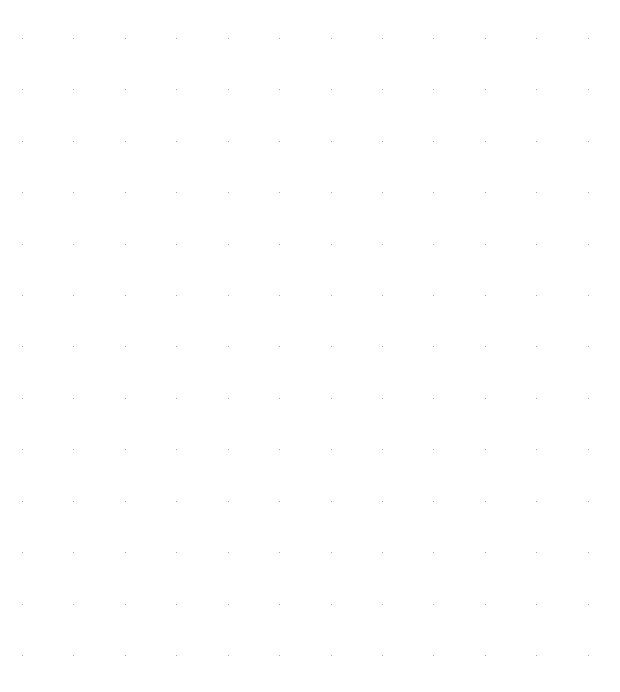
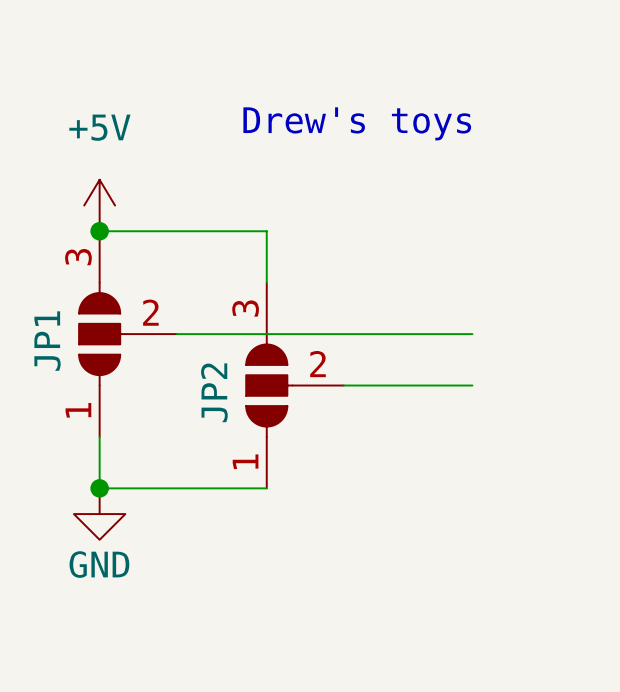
text: none -> Drew's toys (357, 123)
power symbol: none -> +5V (99, 205)
wire: none -> (99, 231) (266, 231) (266, 282)
junction: none -> (99, 231)
JP1: none -> (127, 334)
wire: none -> (176, 334) (472, 334)
JP2: none -> (295, 385)
wire: none -> (343, 385) (472, 385)
wire: none -> (99, 436) (99, 488) (266, 488)
junction: none -> (99, 488)
power symbol: none -> GND (99, 514)

